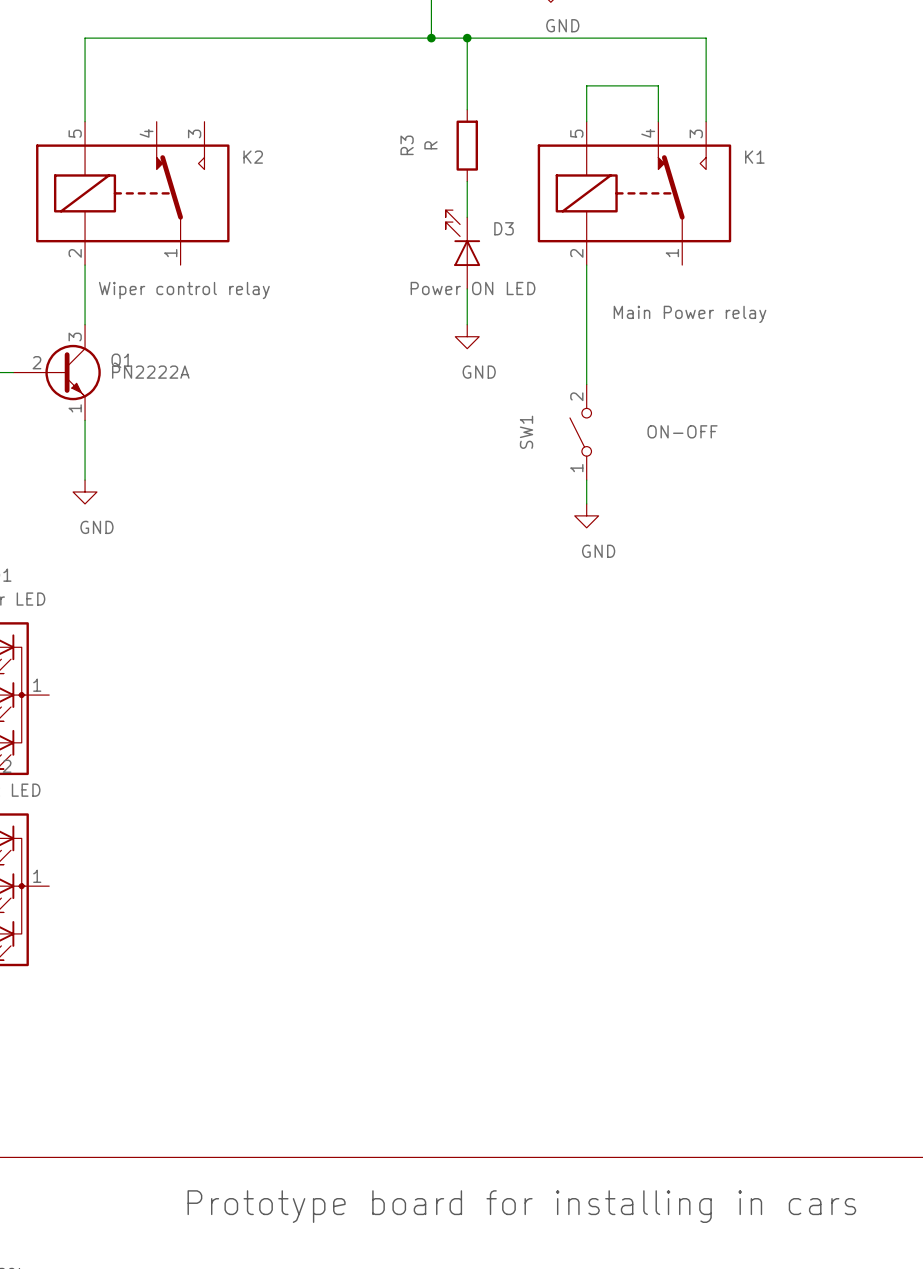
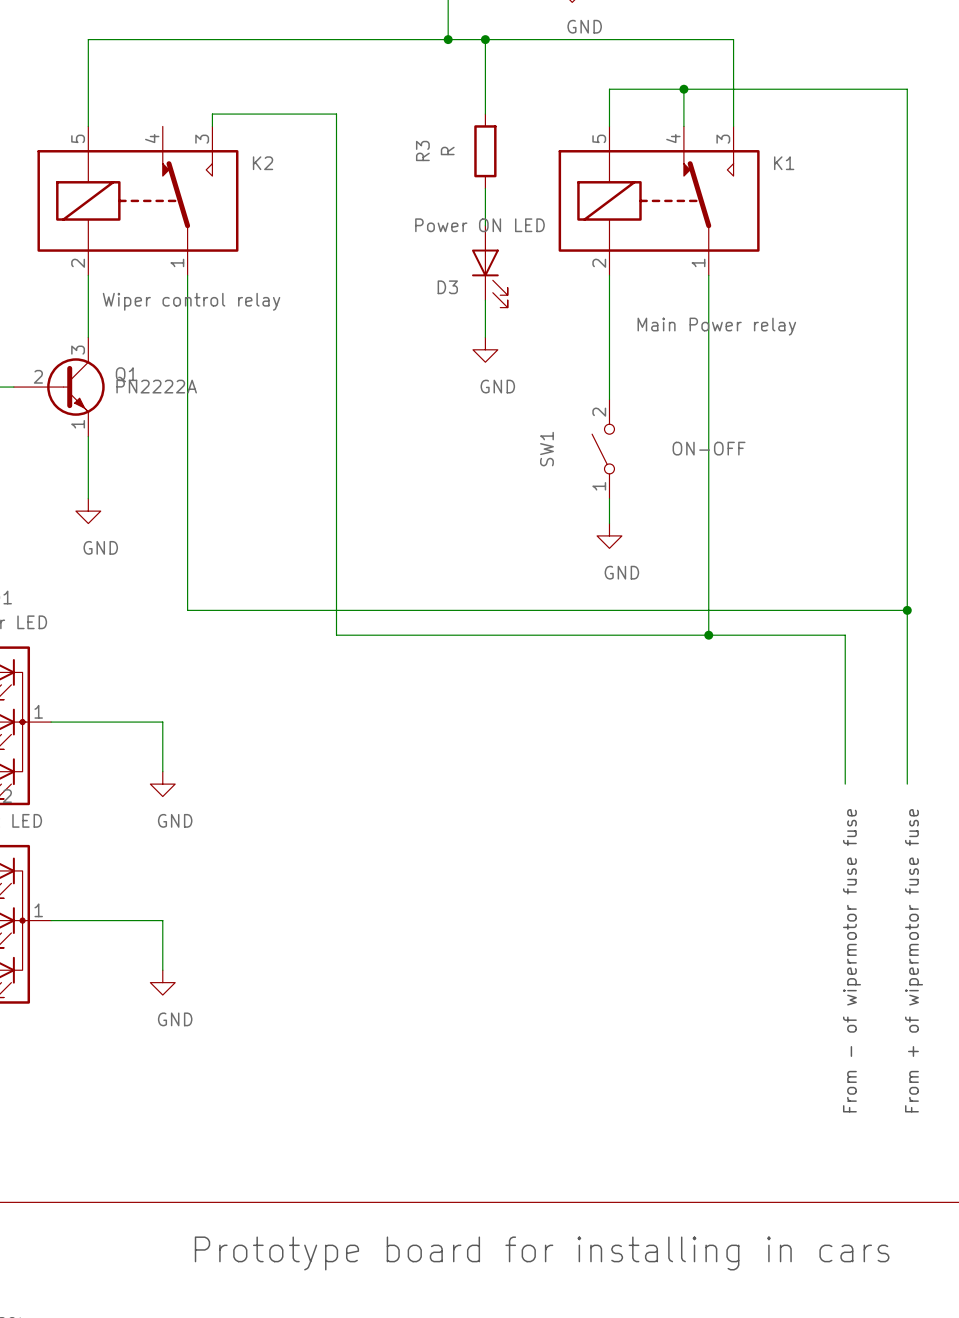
wire: none -> (683, 89) (907, 89) (907, 784)
junction: none -> (683, 89)
wire: none -> (212, 126) (212, 114) (336, 114) (336, 635) (845, 635) (845, 784)
D3 rotation: 0° (462, 238) -> 180° (489, 278)
wire: none -> (187, 275) (187, 610) (907, 610)
wire: none -> (708, 275) (708, 635)
junction: none -> (907, 610)
junction: none -> (708, 635)
wire: none -> (51, 722) (162, 722) (162, 771)
power symbol: none -> GND (162, 784)
wire: none -> (51, 920) (162, 920) (162, 970)
text: none -> From - of wipermotor fuse fuse (851, 960)
text: none -> From + of wipermotor fuse fuse (914, 960)
power symbol: none -> GND (162, 982)

